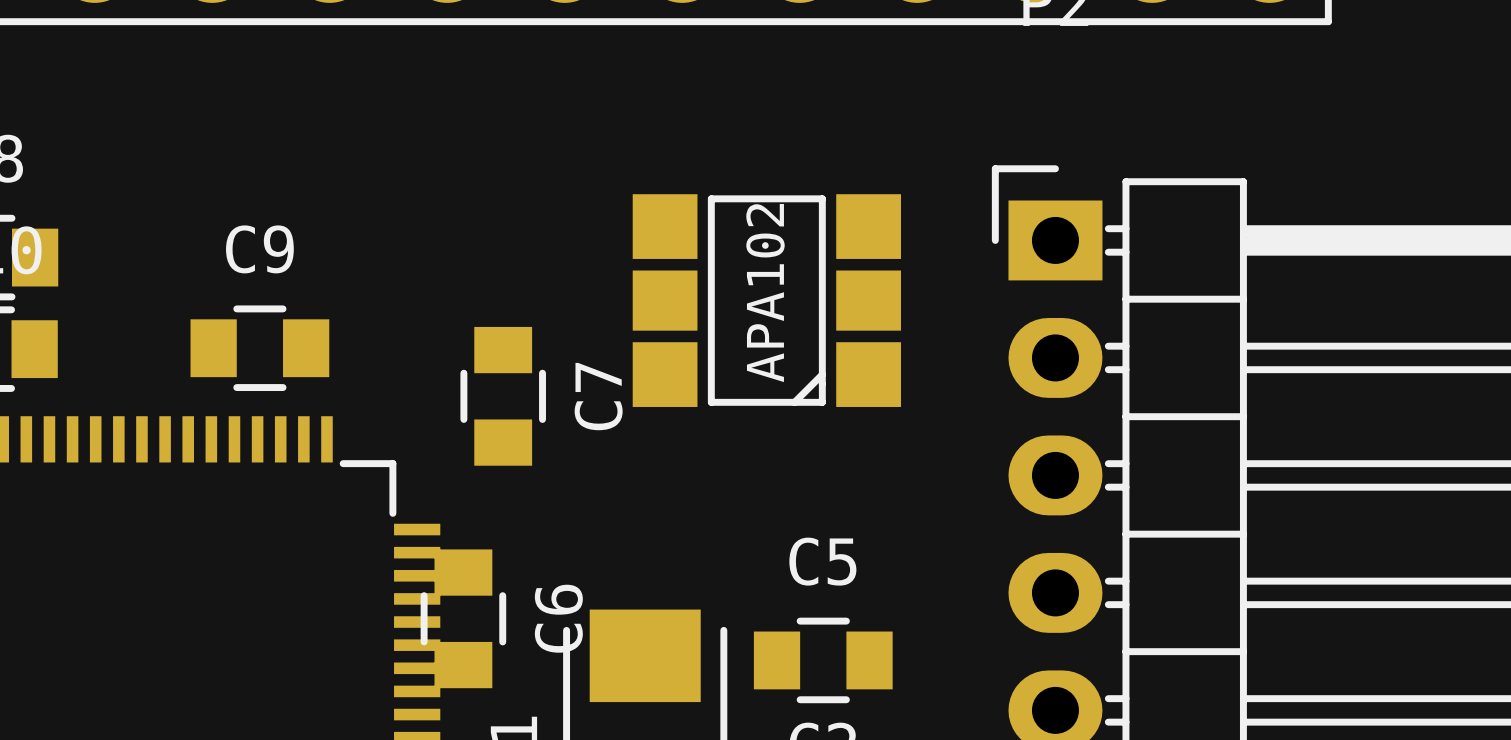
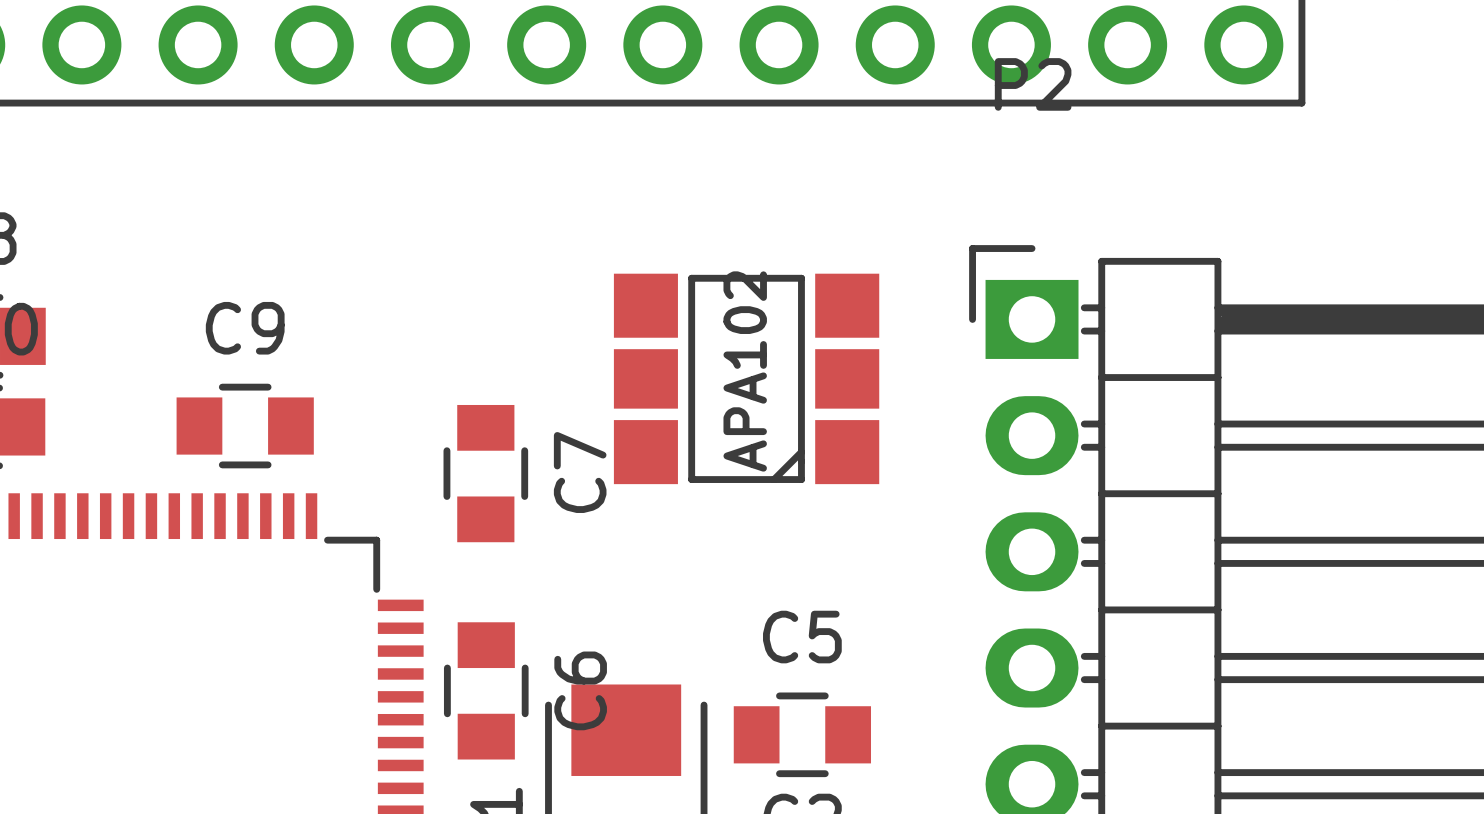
C6 position: (463, 618) -> (486, 690)

